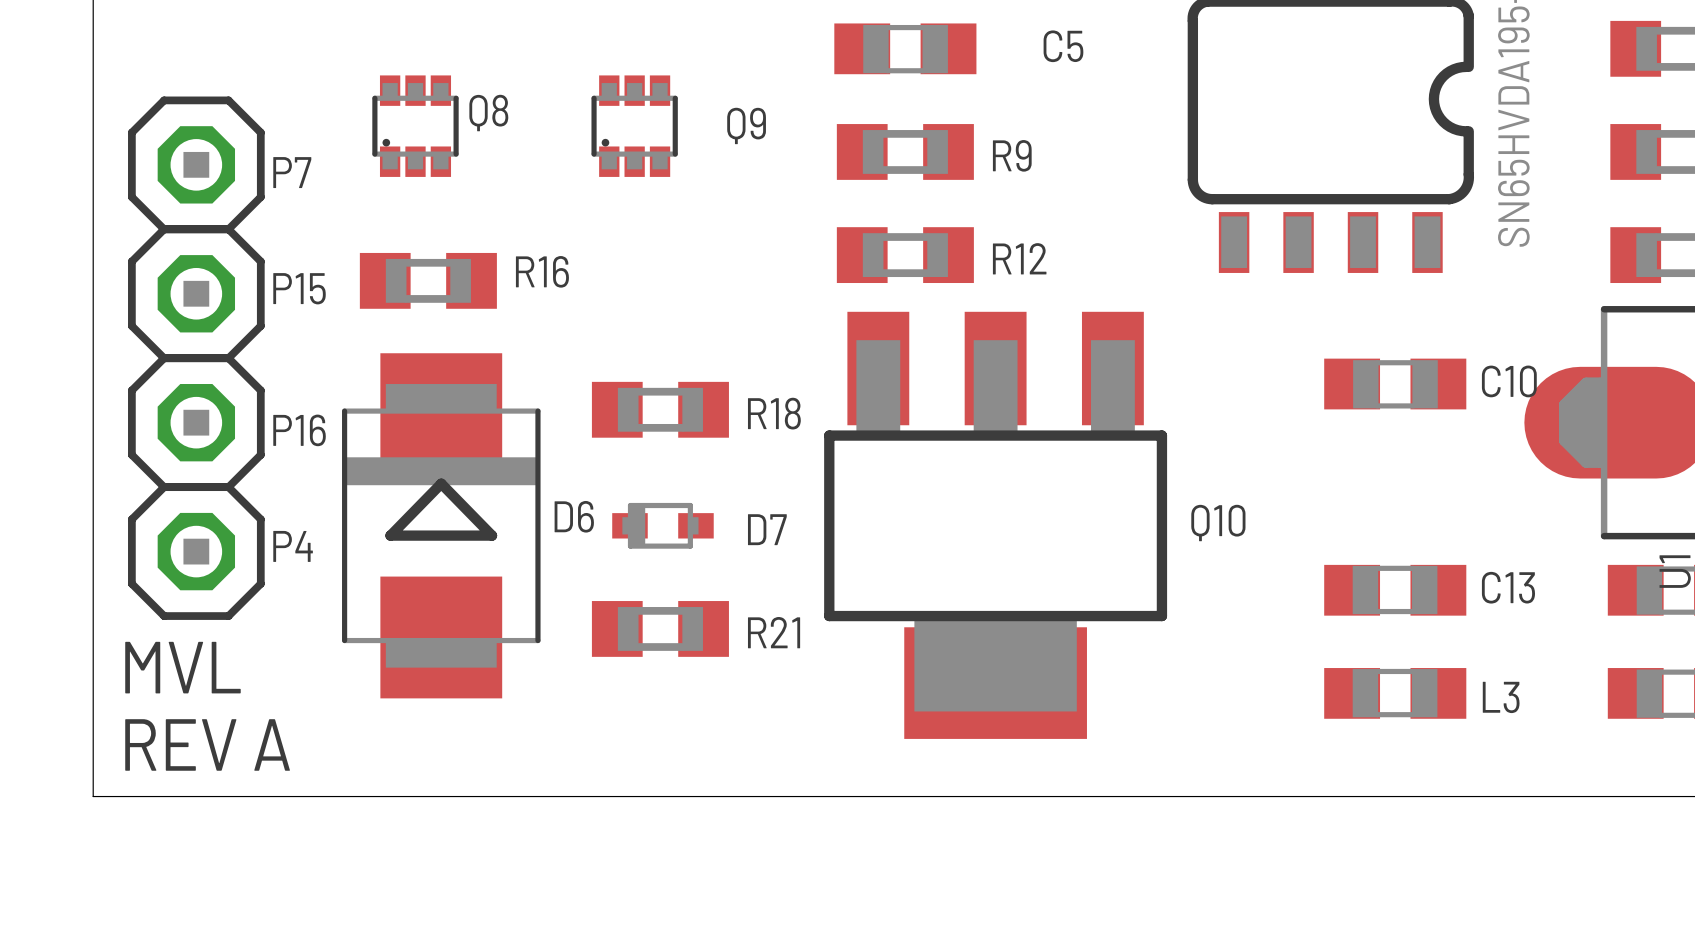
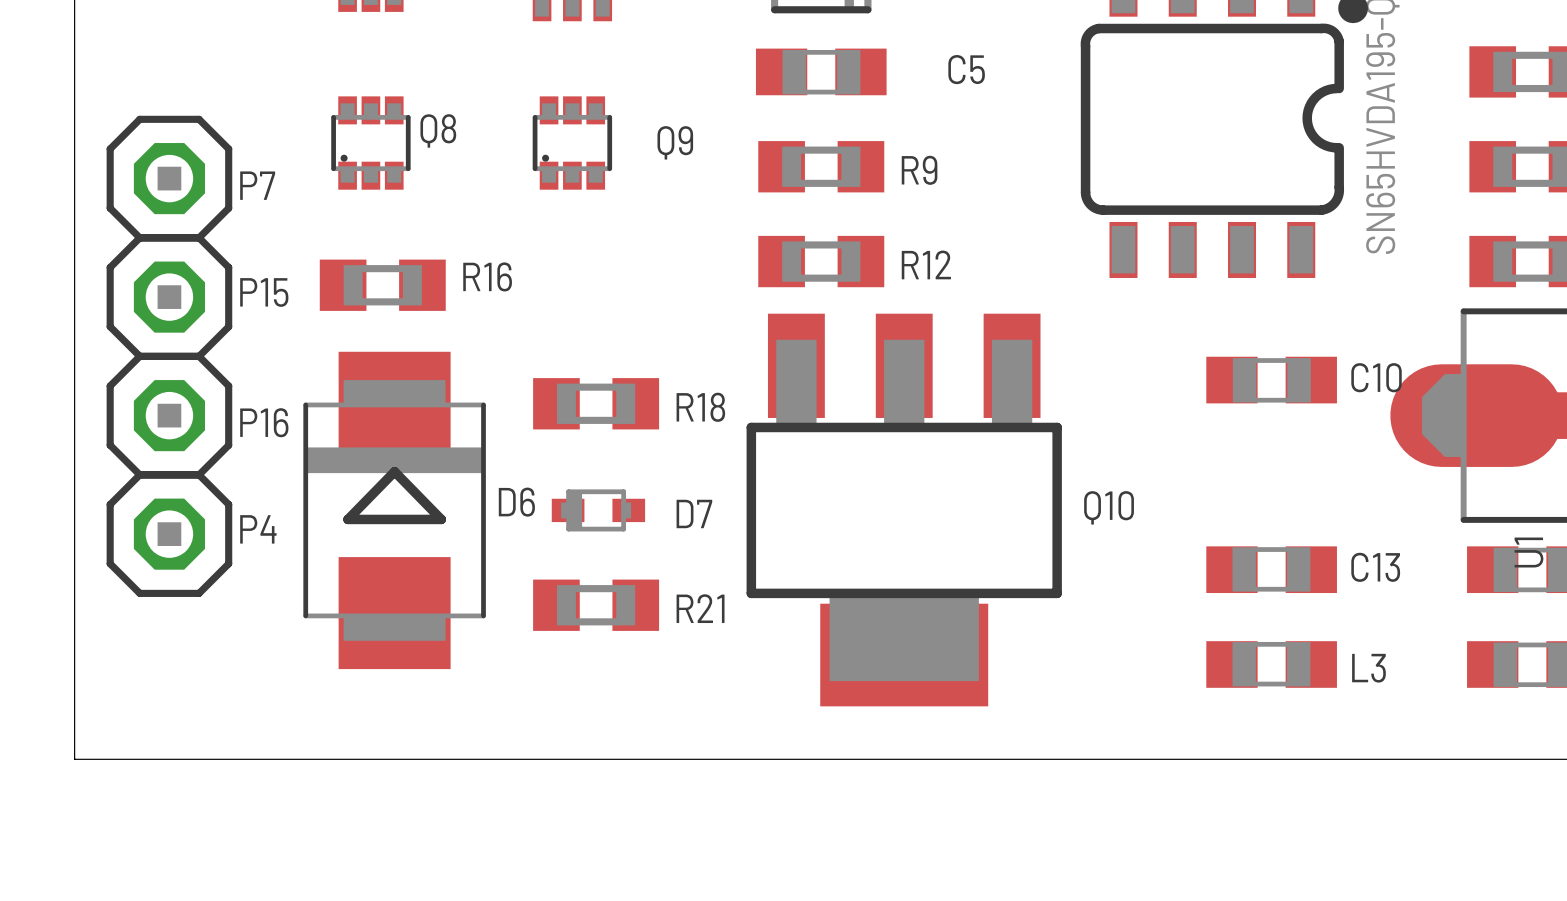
text: MVL (182, 667) -> none
text: REV A (207, 744) -> none

